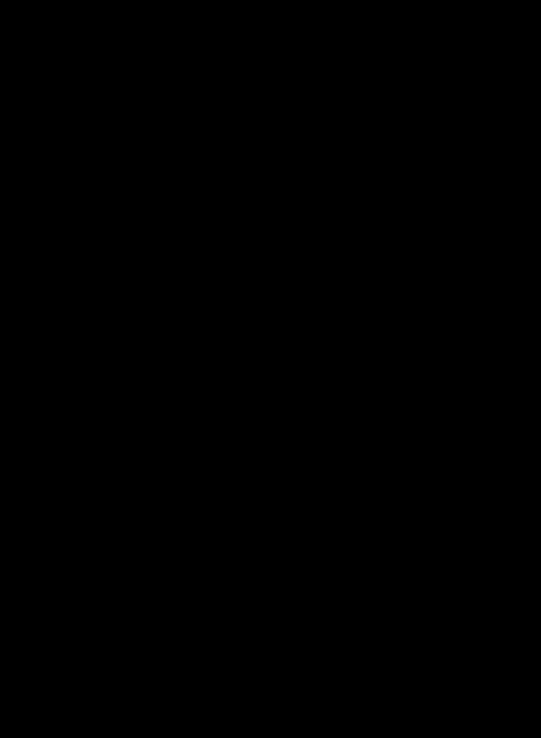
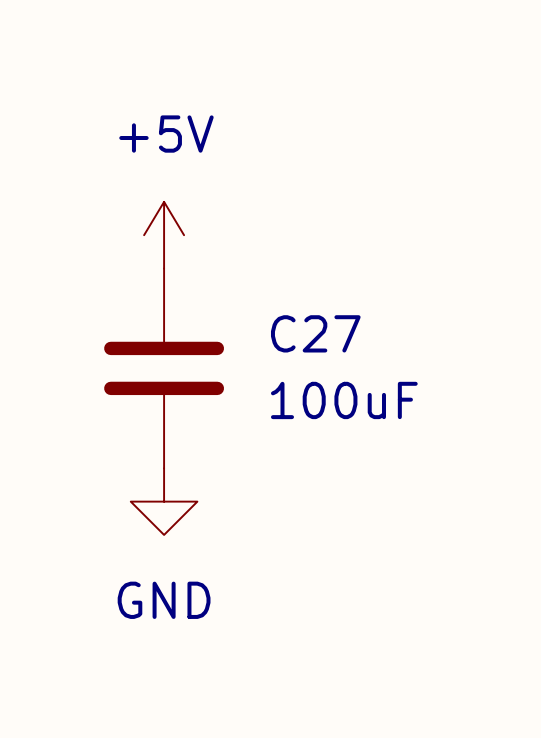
power symbol: none -> +5V (164, 235)
C27: none -> 100uF (164, 368)
power symbol: none -> GND (164, 501)

